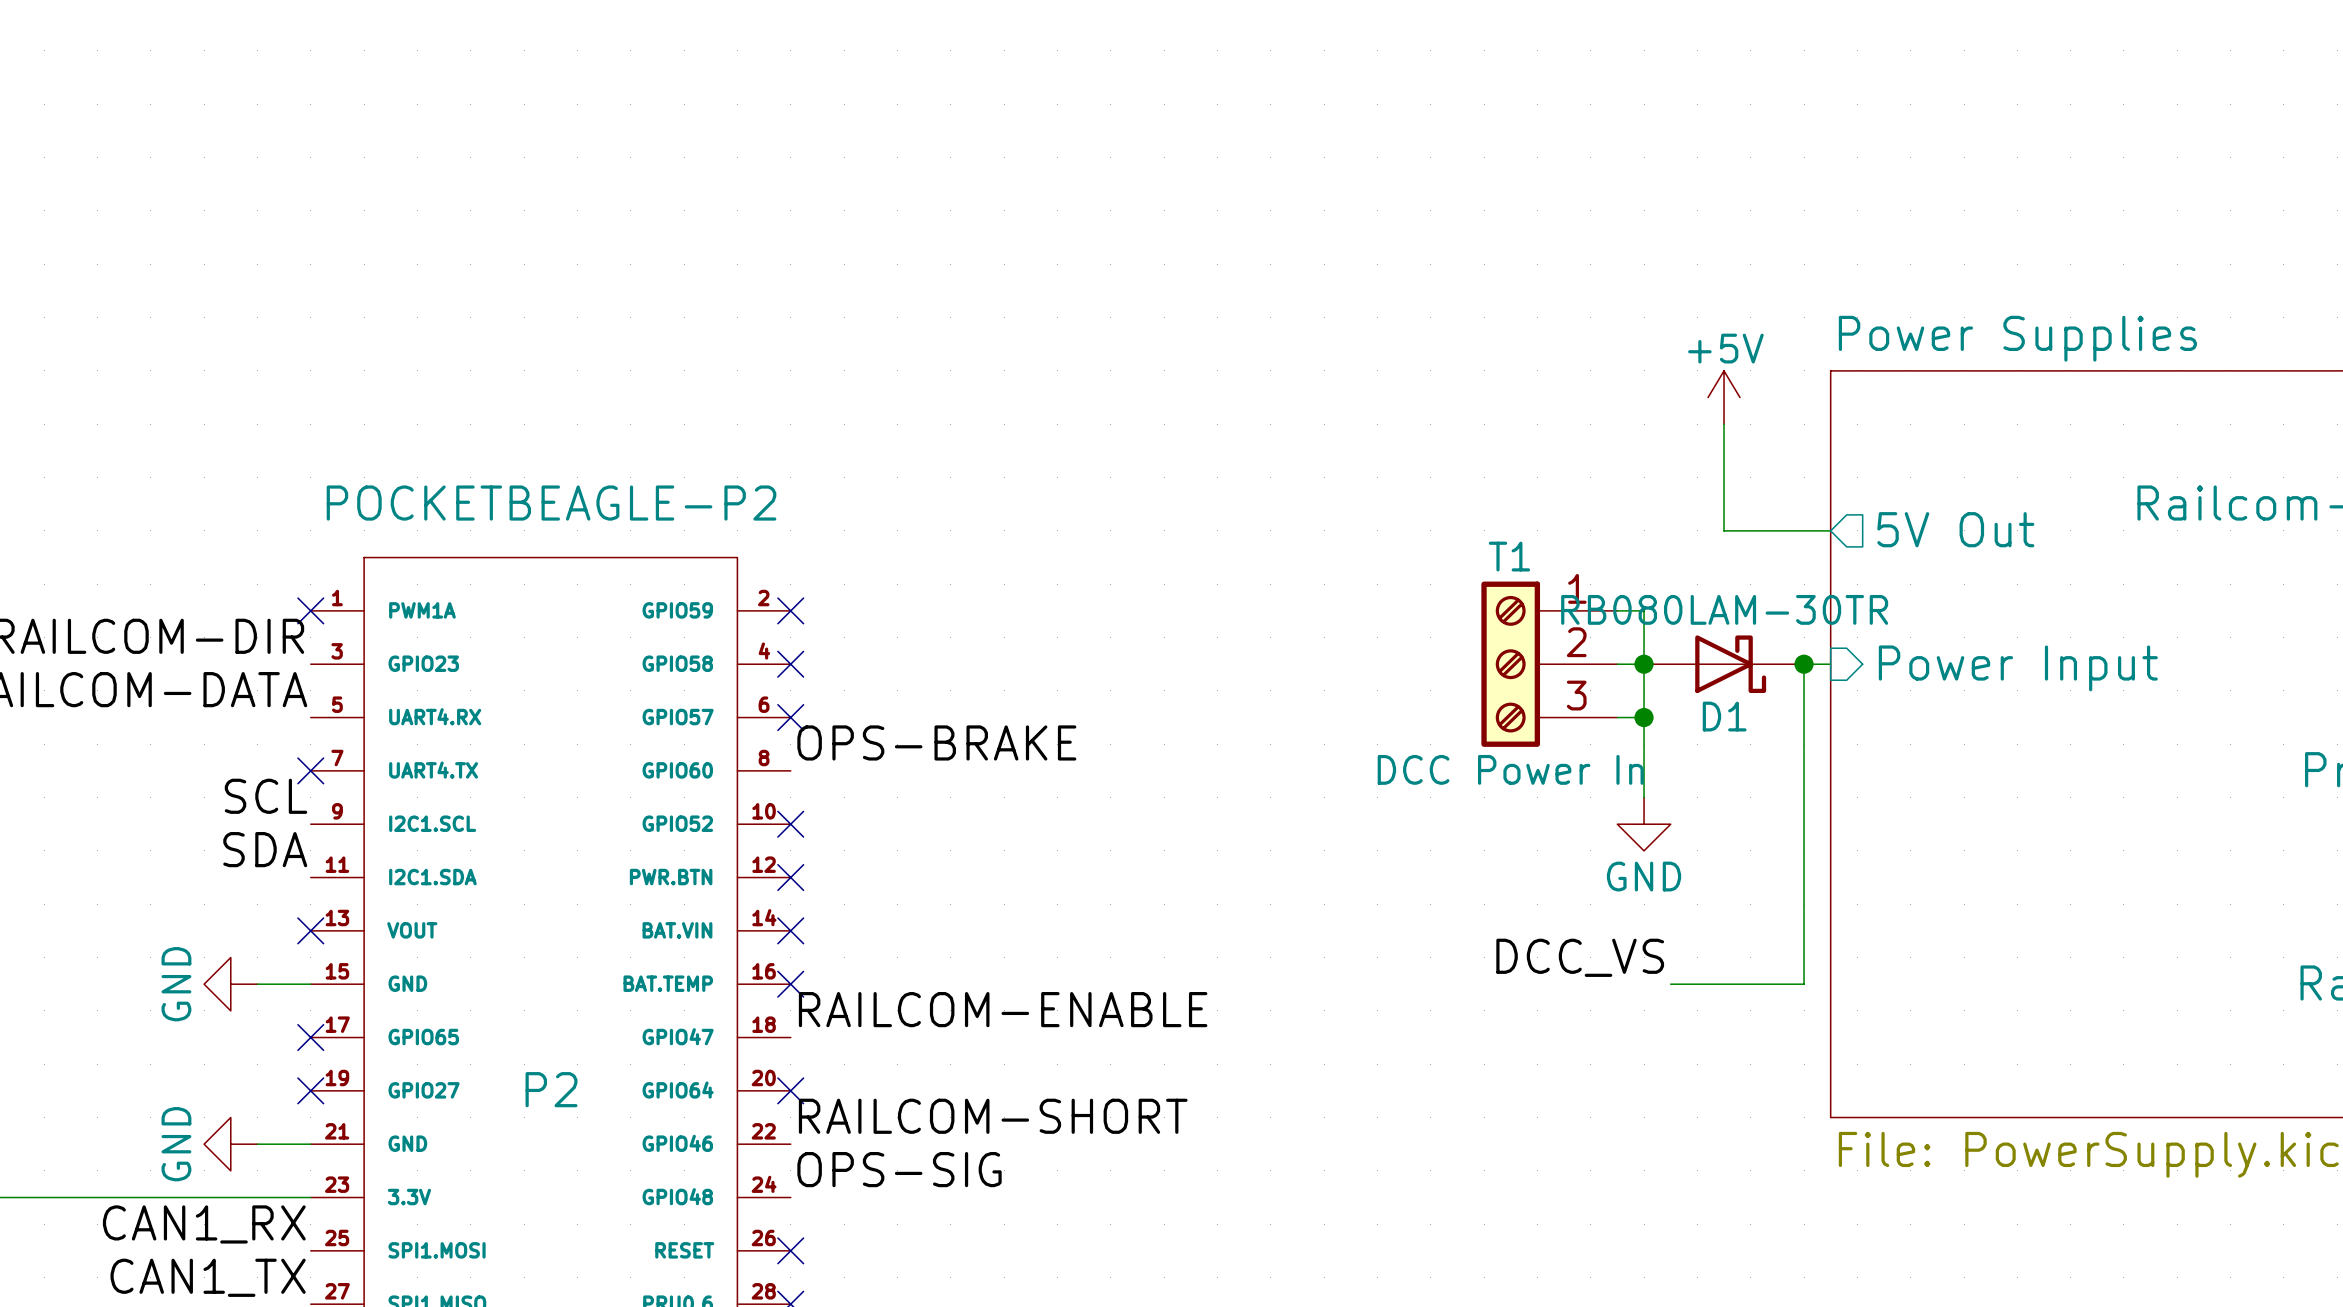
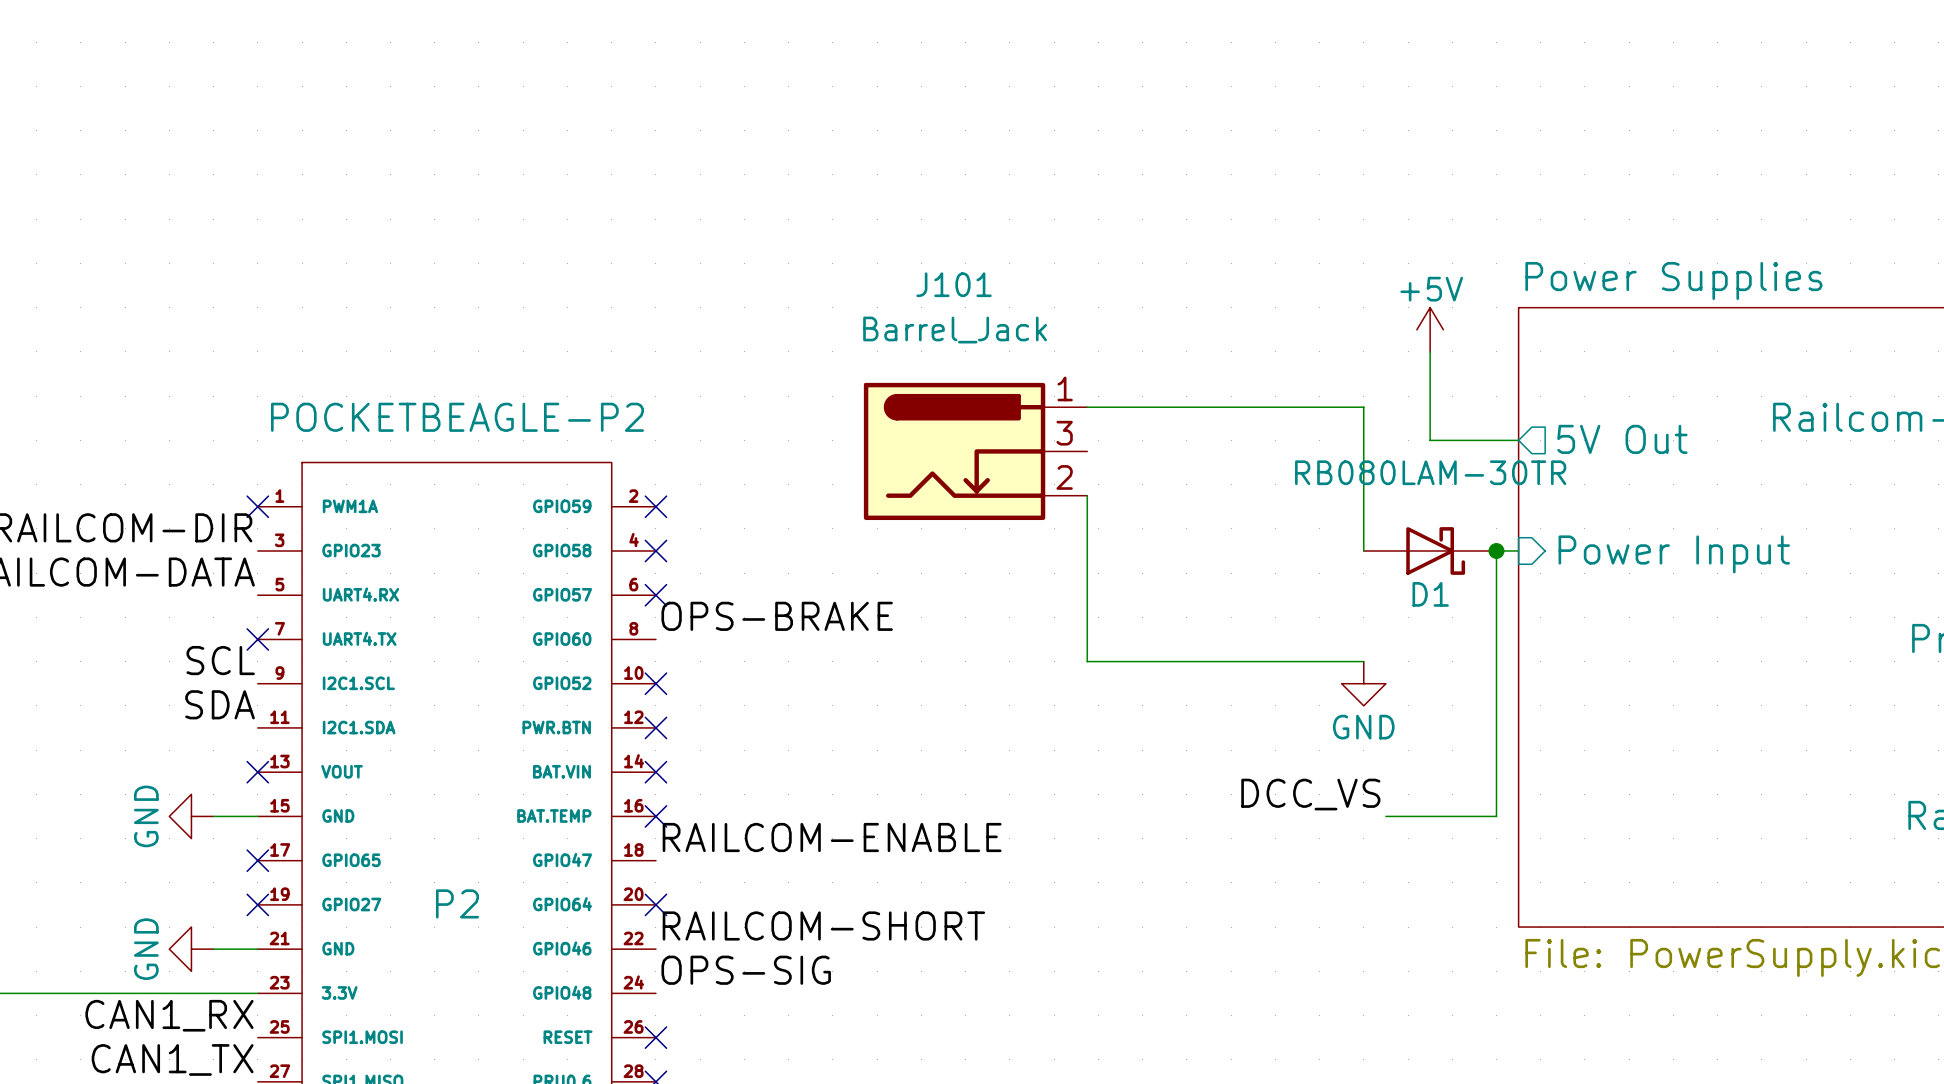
J101: none -> Barrel_Jack (975, 451)
D1 value position: RB080LAM-30TR (1724, 609) -> RB080LAM-30TR (1430, 472)
wire: (1617, 610) (1644, 610) -> (1087, 407) (1363, 407) (1363, 506)
T1: DCC Power In (1549, 664) -> none
wire: (1617, 664) (1644, 664) (1644, 797) -> (1087, 495) (1087, 661) (1363, 661)
junction: (1644, 664) -> none
wire: (1617, 717) (1644, 717) -> none
junction: (1644, 717) -> none

